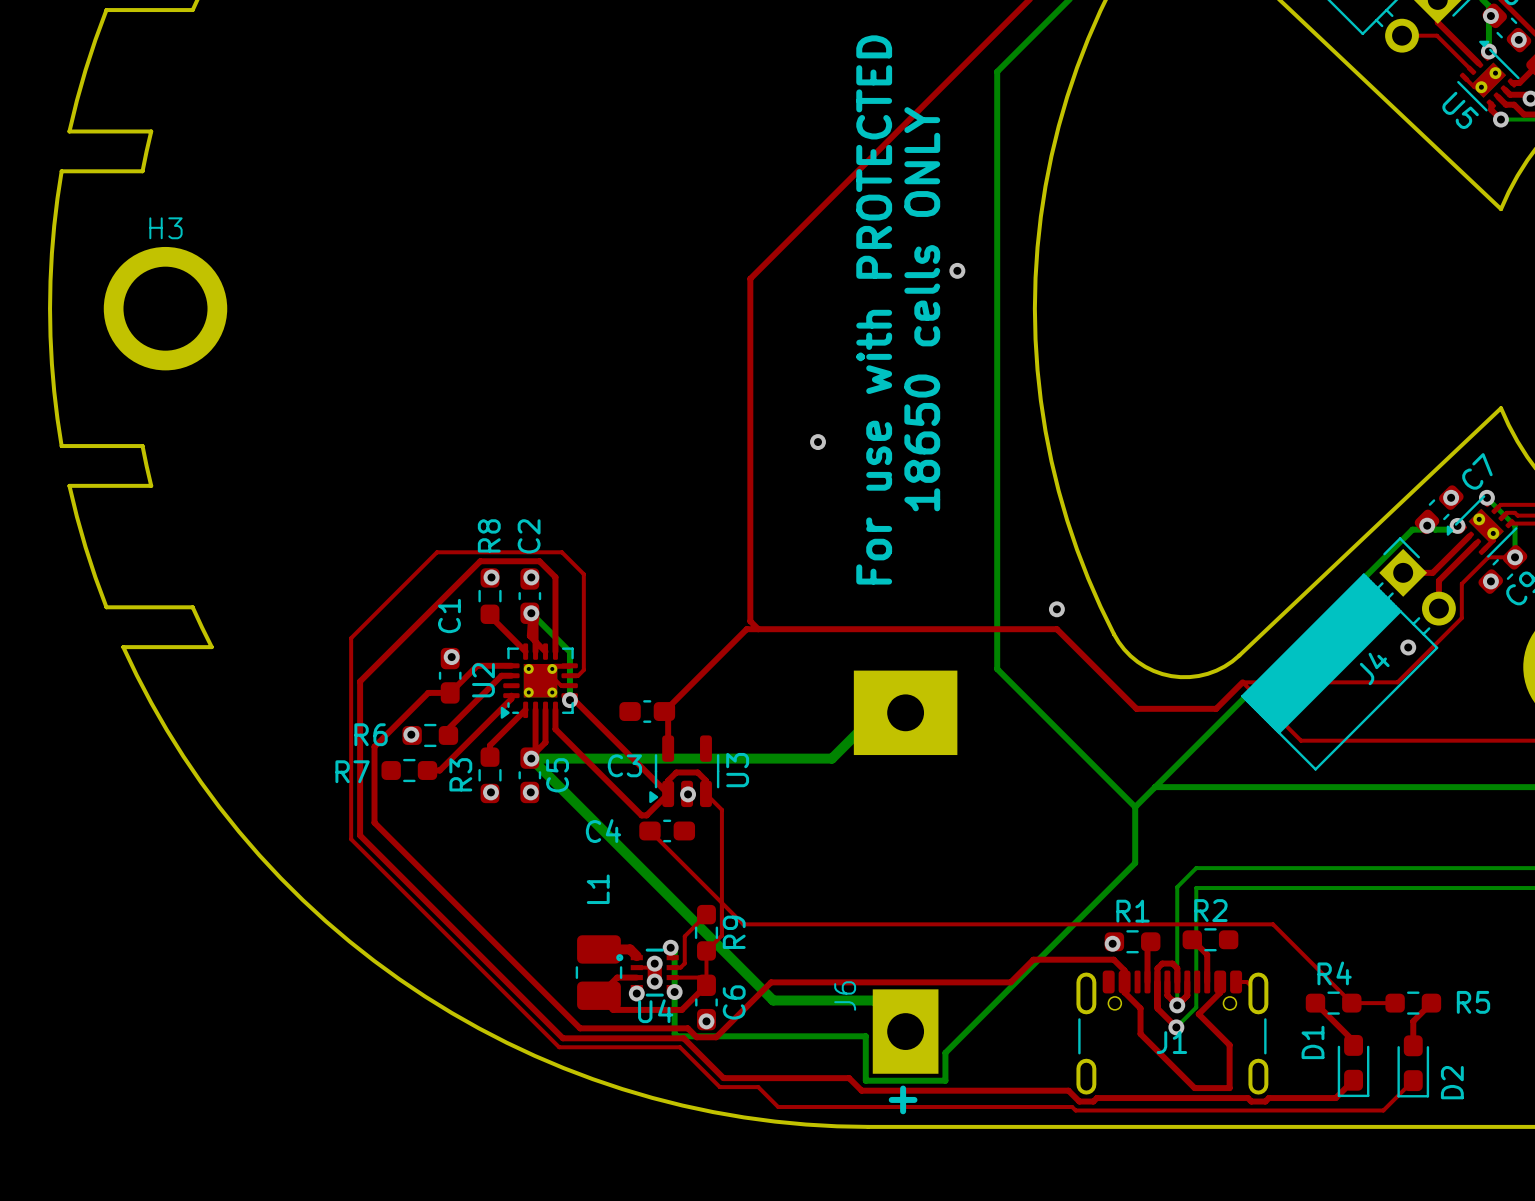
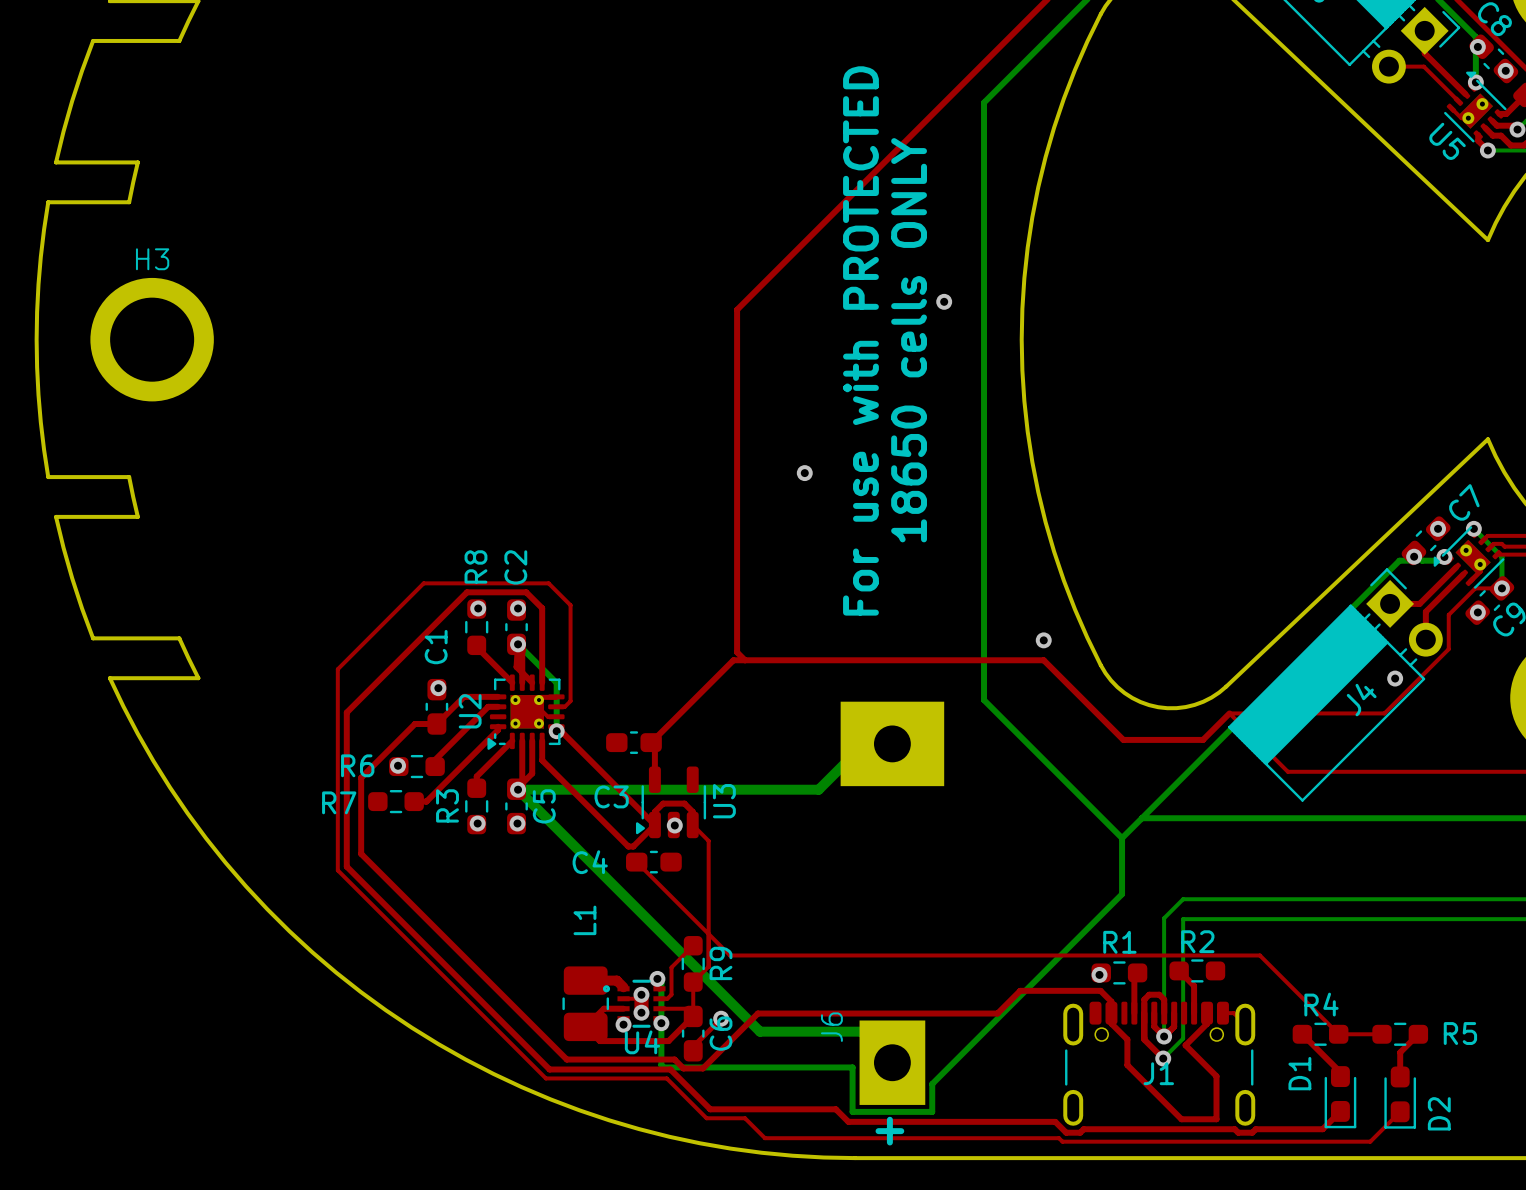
top track: none -> (721, 1018) (693, 1046) (693, 1050)
via position: (706, 1021) -> (721, 1018)

